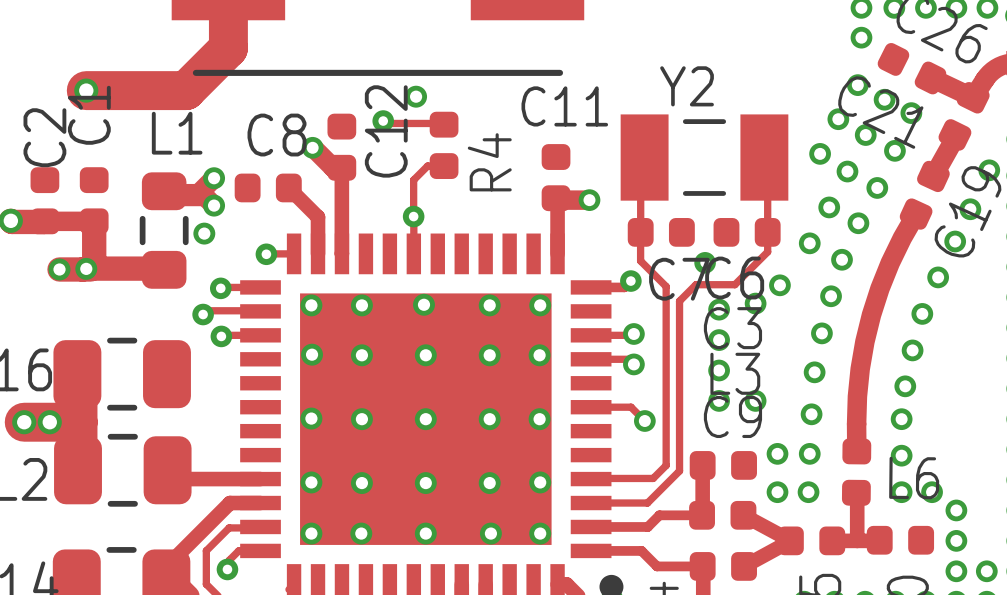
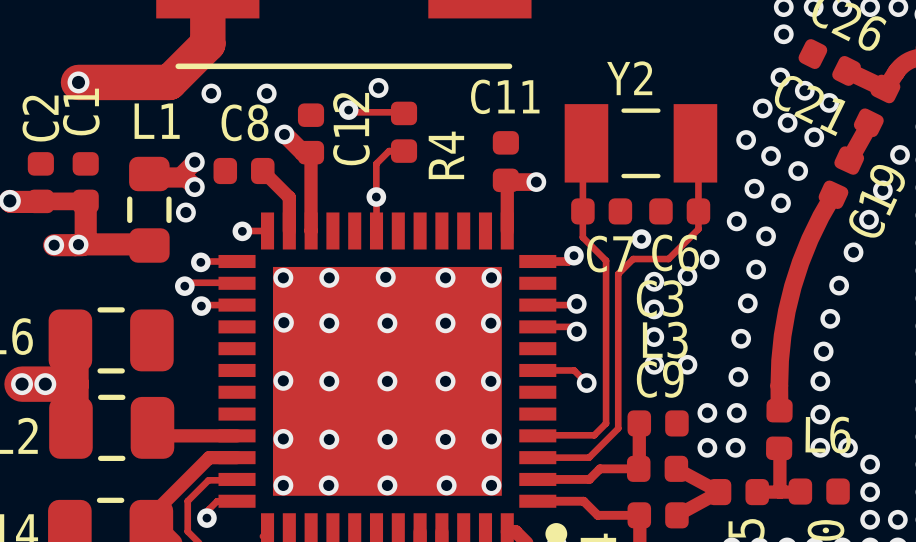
via: none -> (211, 93)
via: none -> (266, 93)

